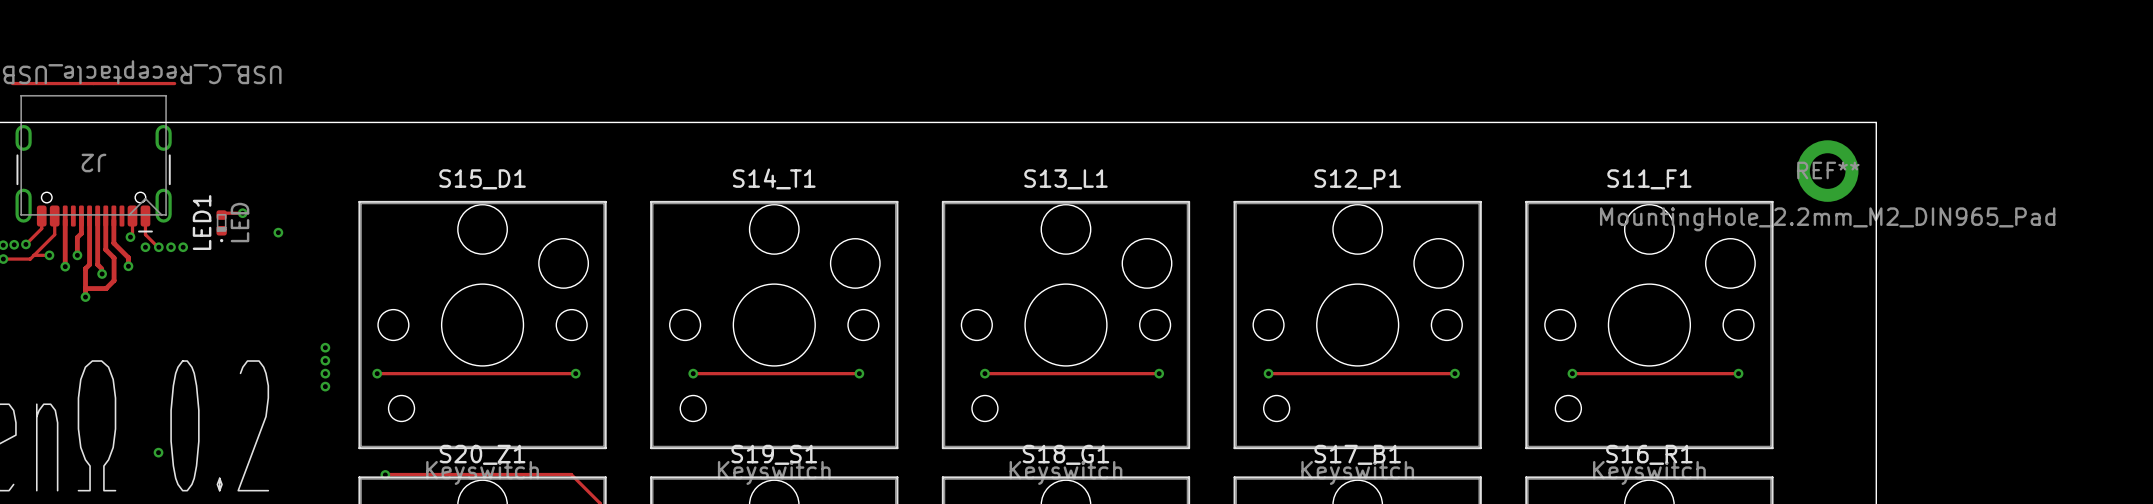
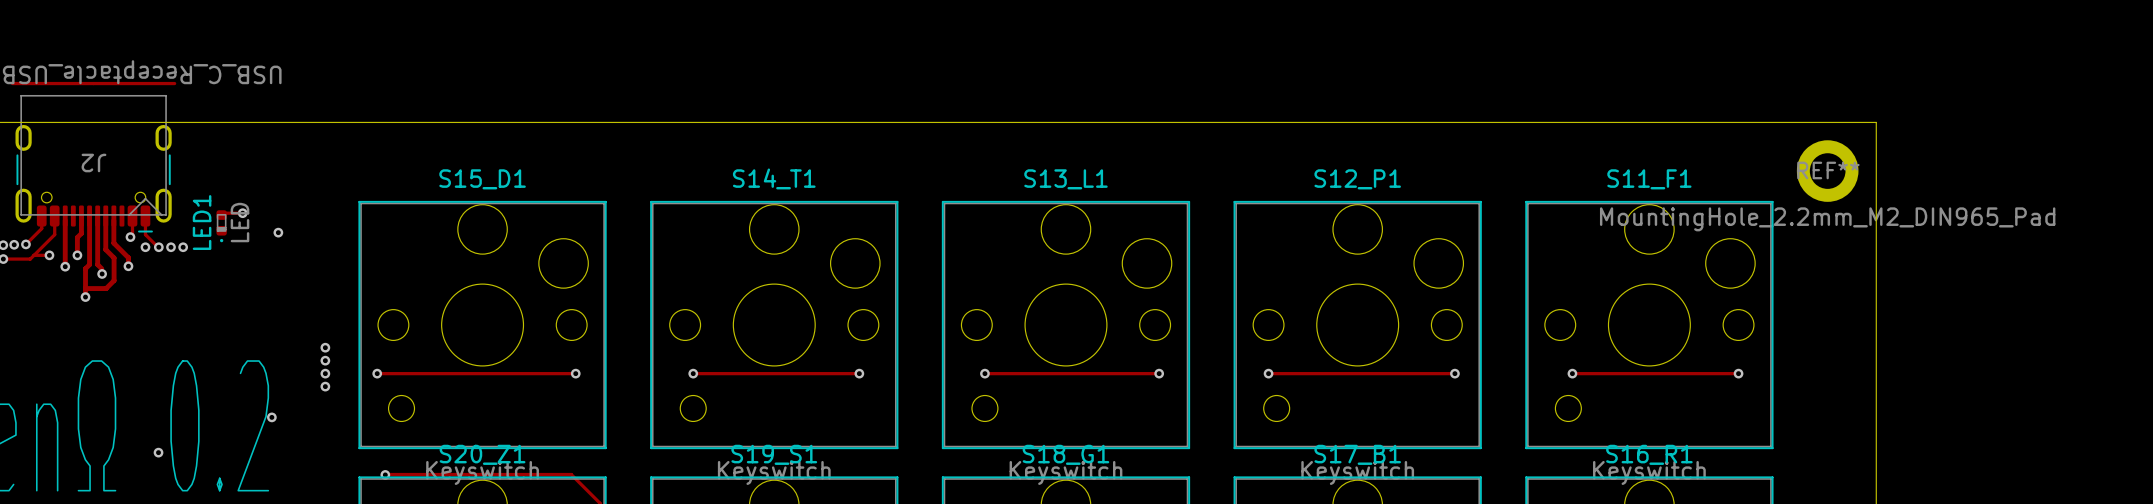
via: none -> (271, 417)

